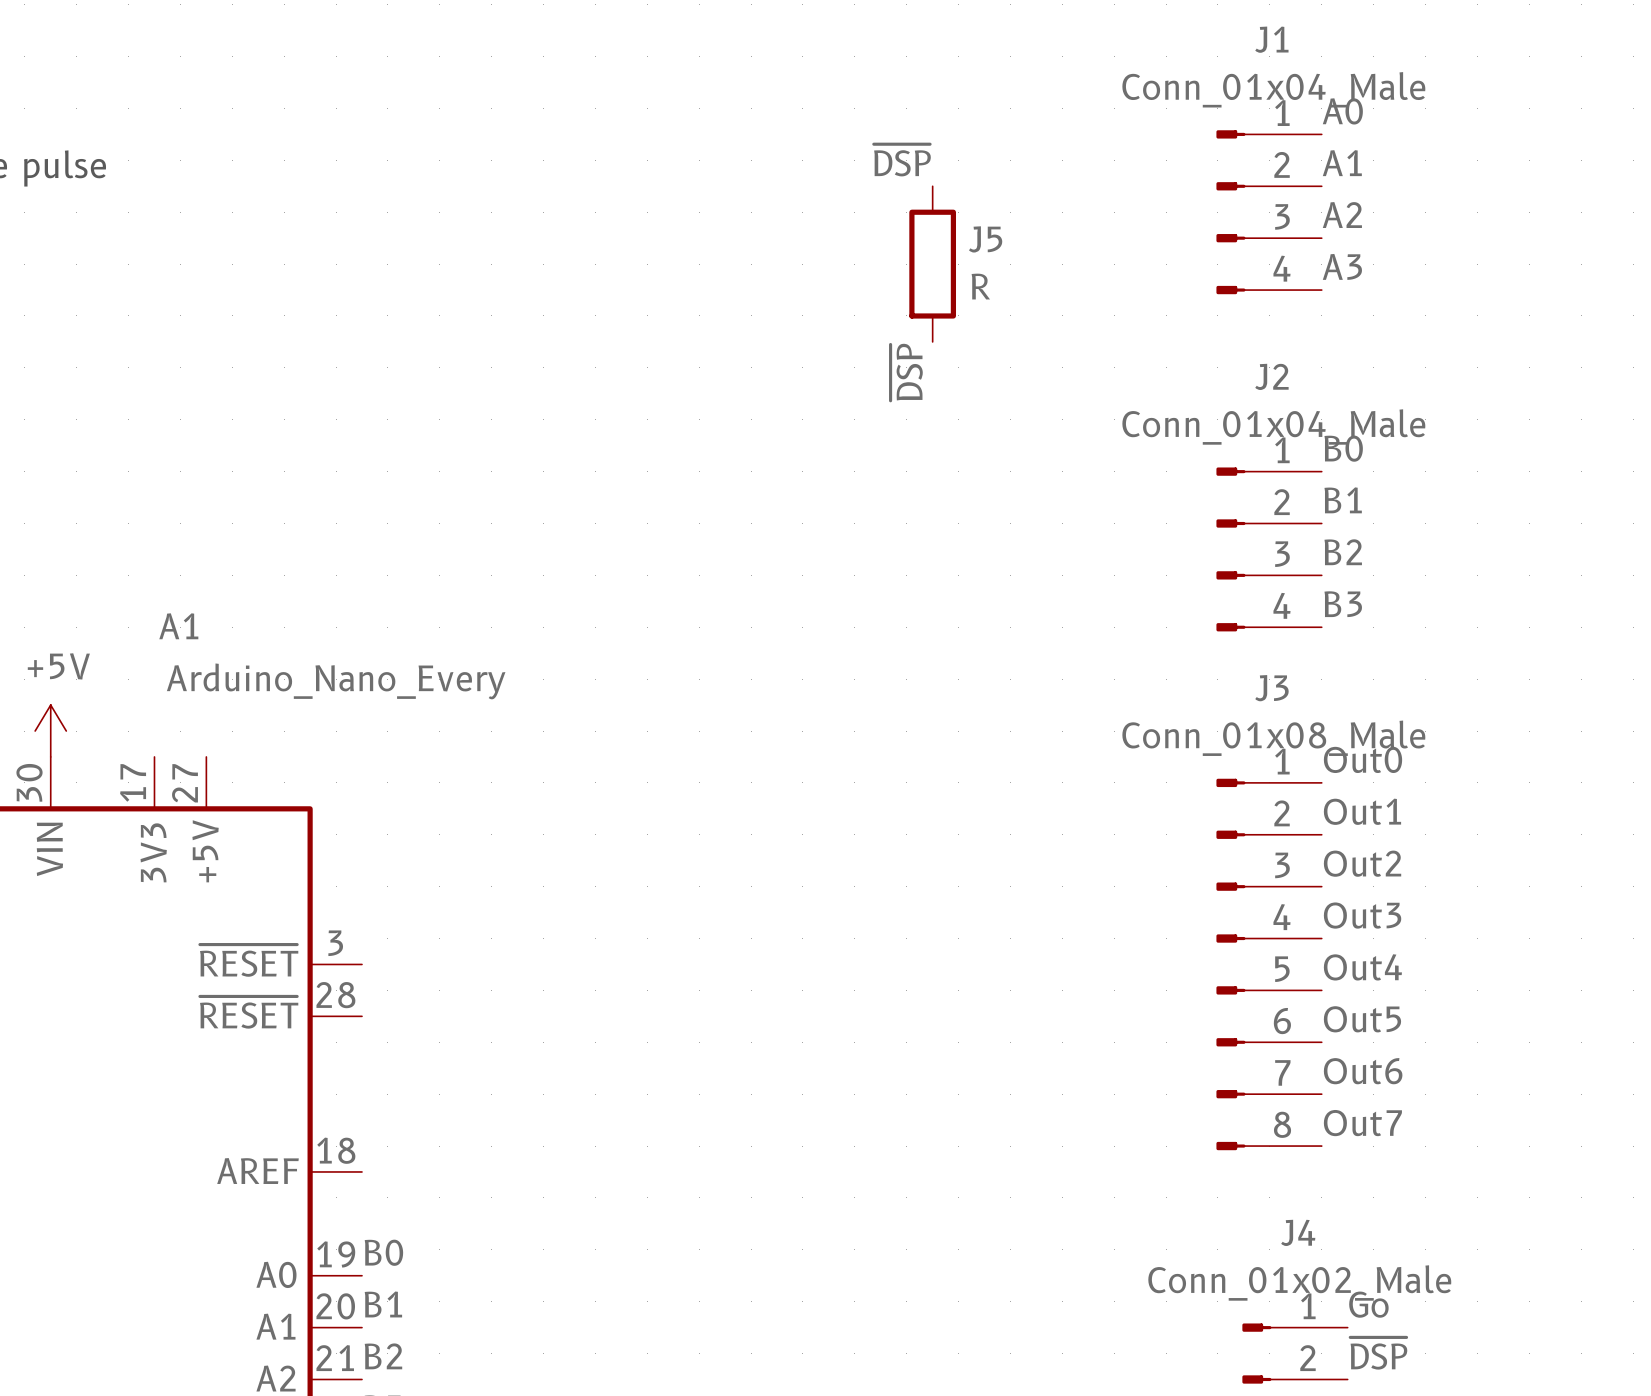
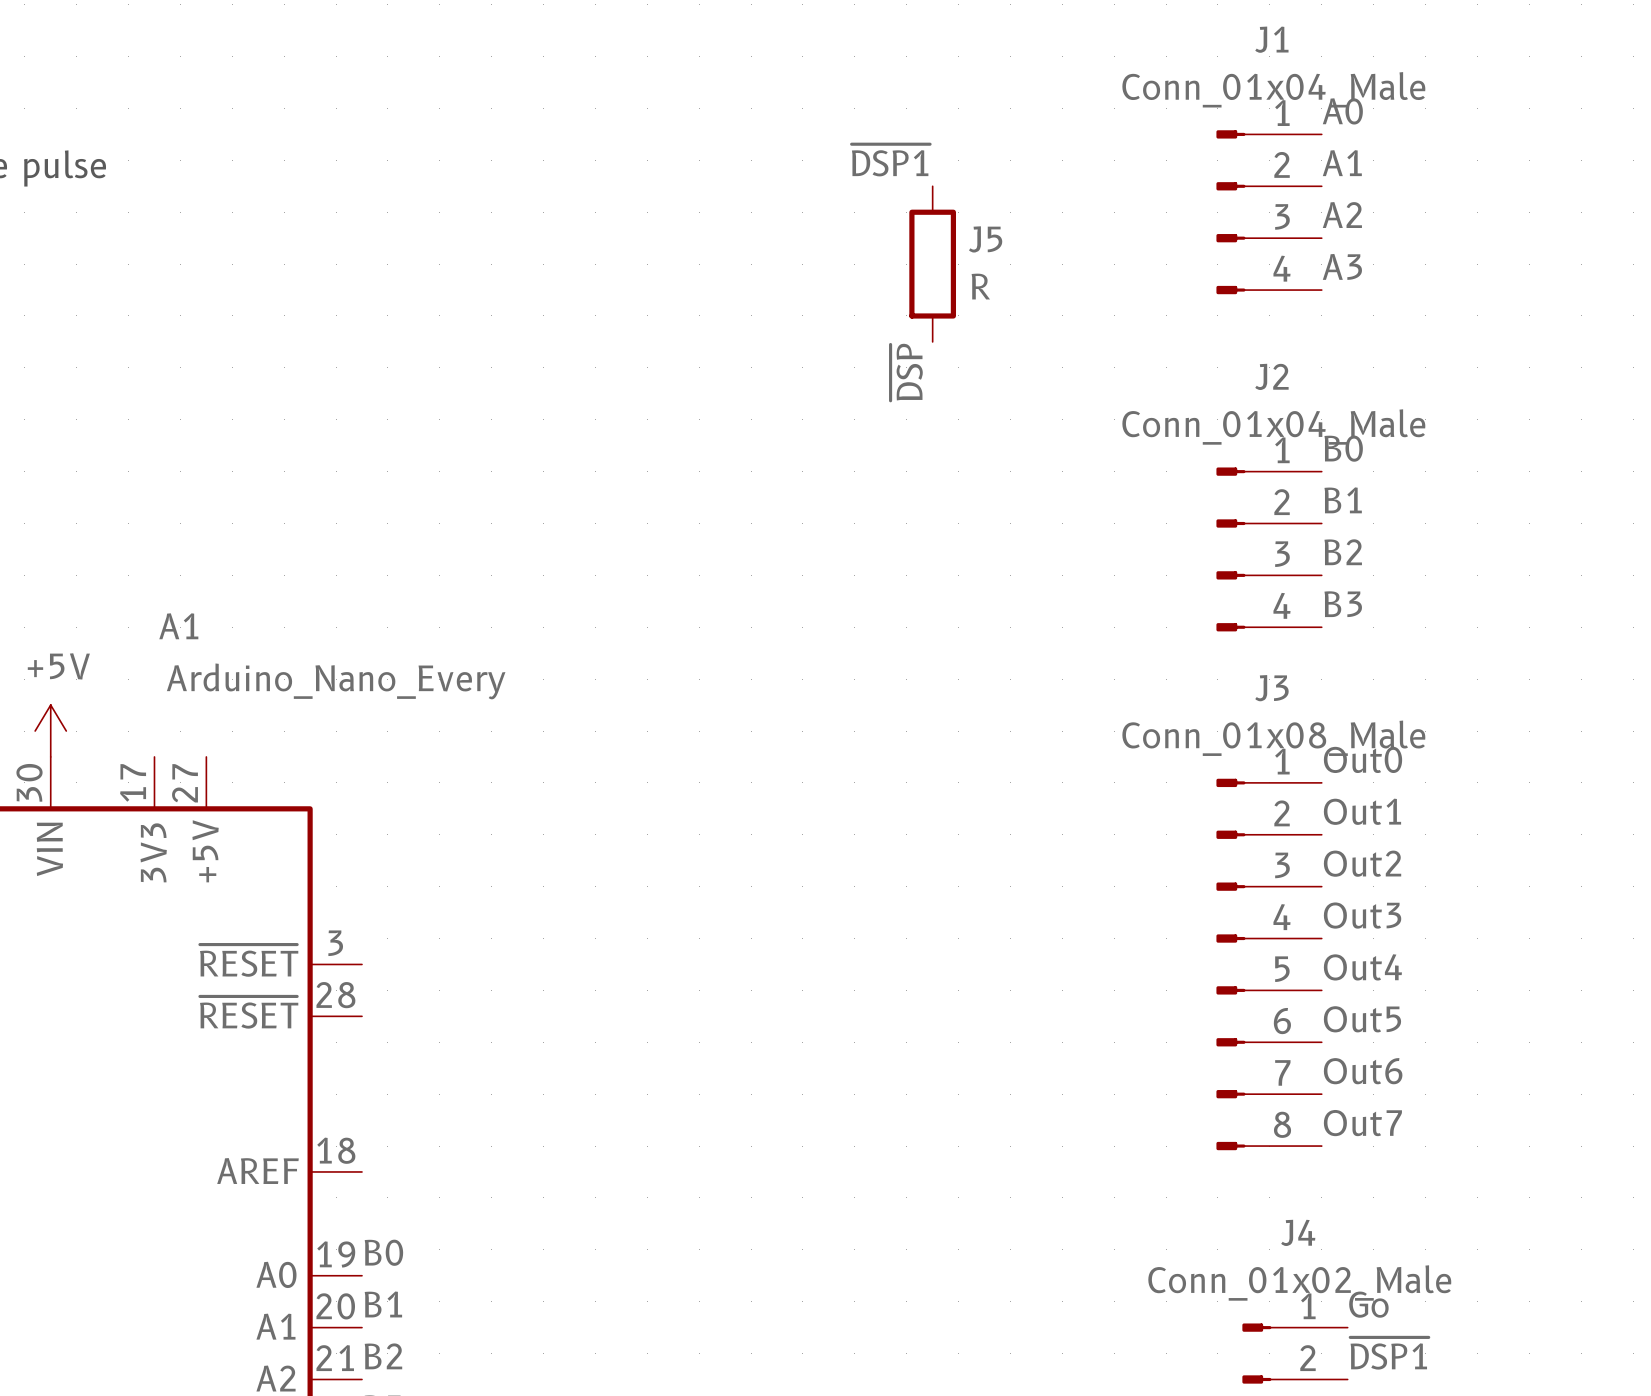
label: ~{DSP} (902, 160) -> ~{DSP1} (890, 160)
label: ~{DSP} (1378, 1353) -> ~{DSP1} (1389, 1353)

